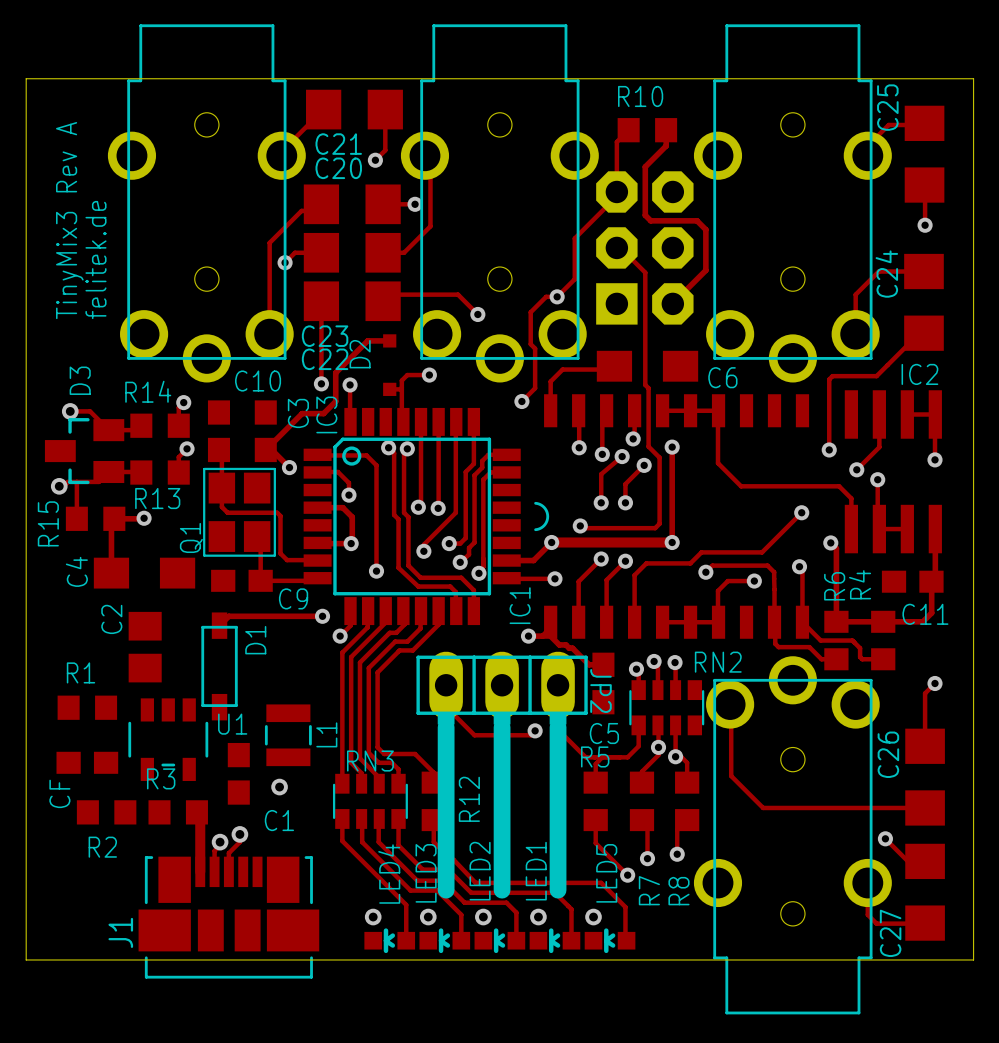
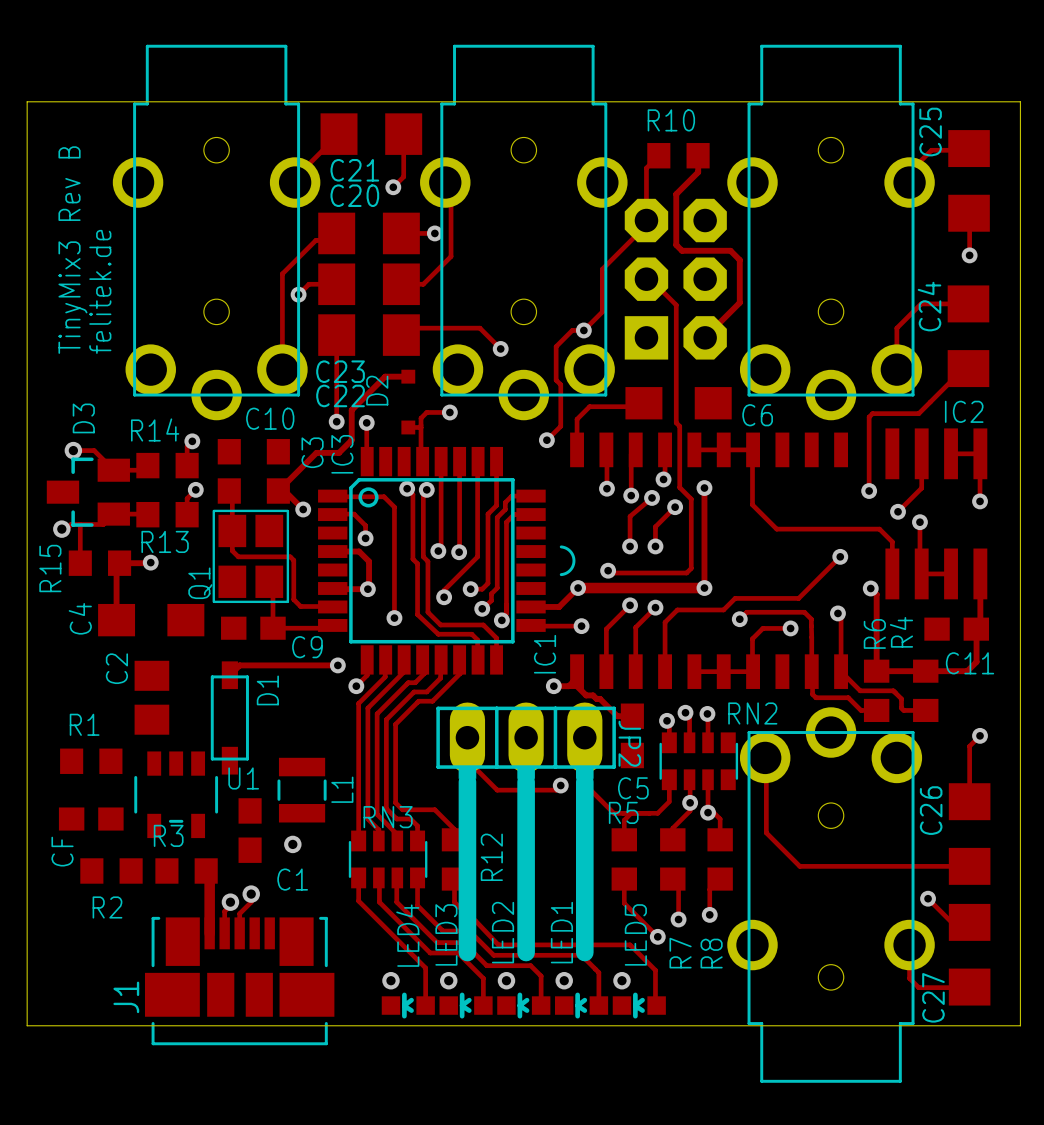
text: TinyMix3 Rev A (69, 220) -> TinyMix3 Rev B (72, 250)

